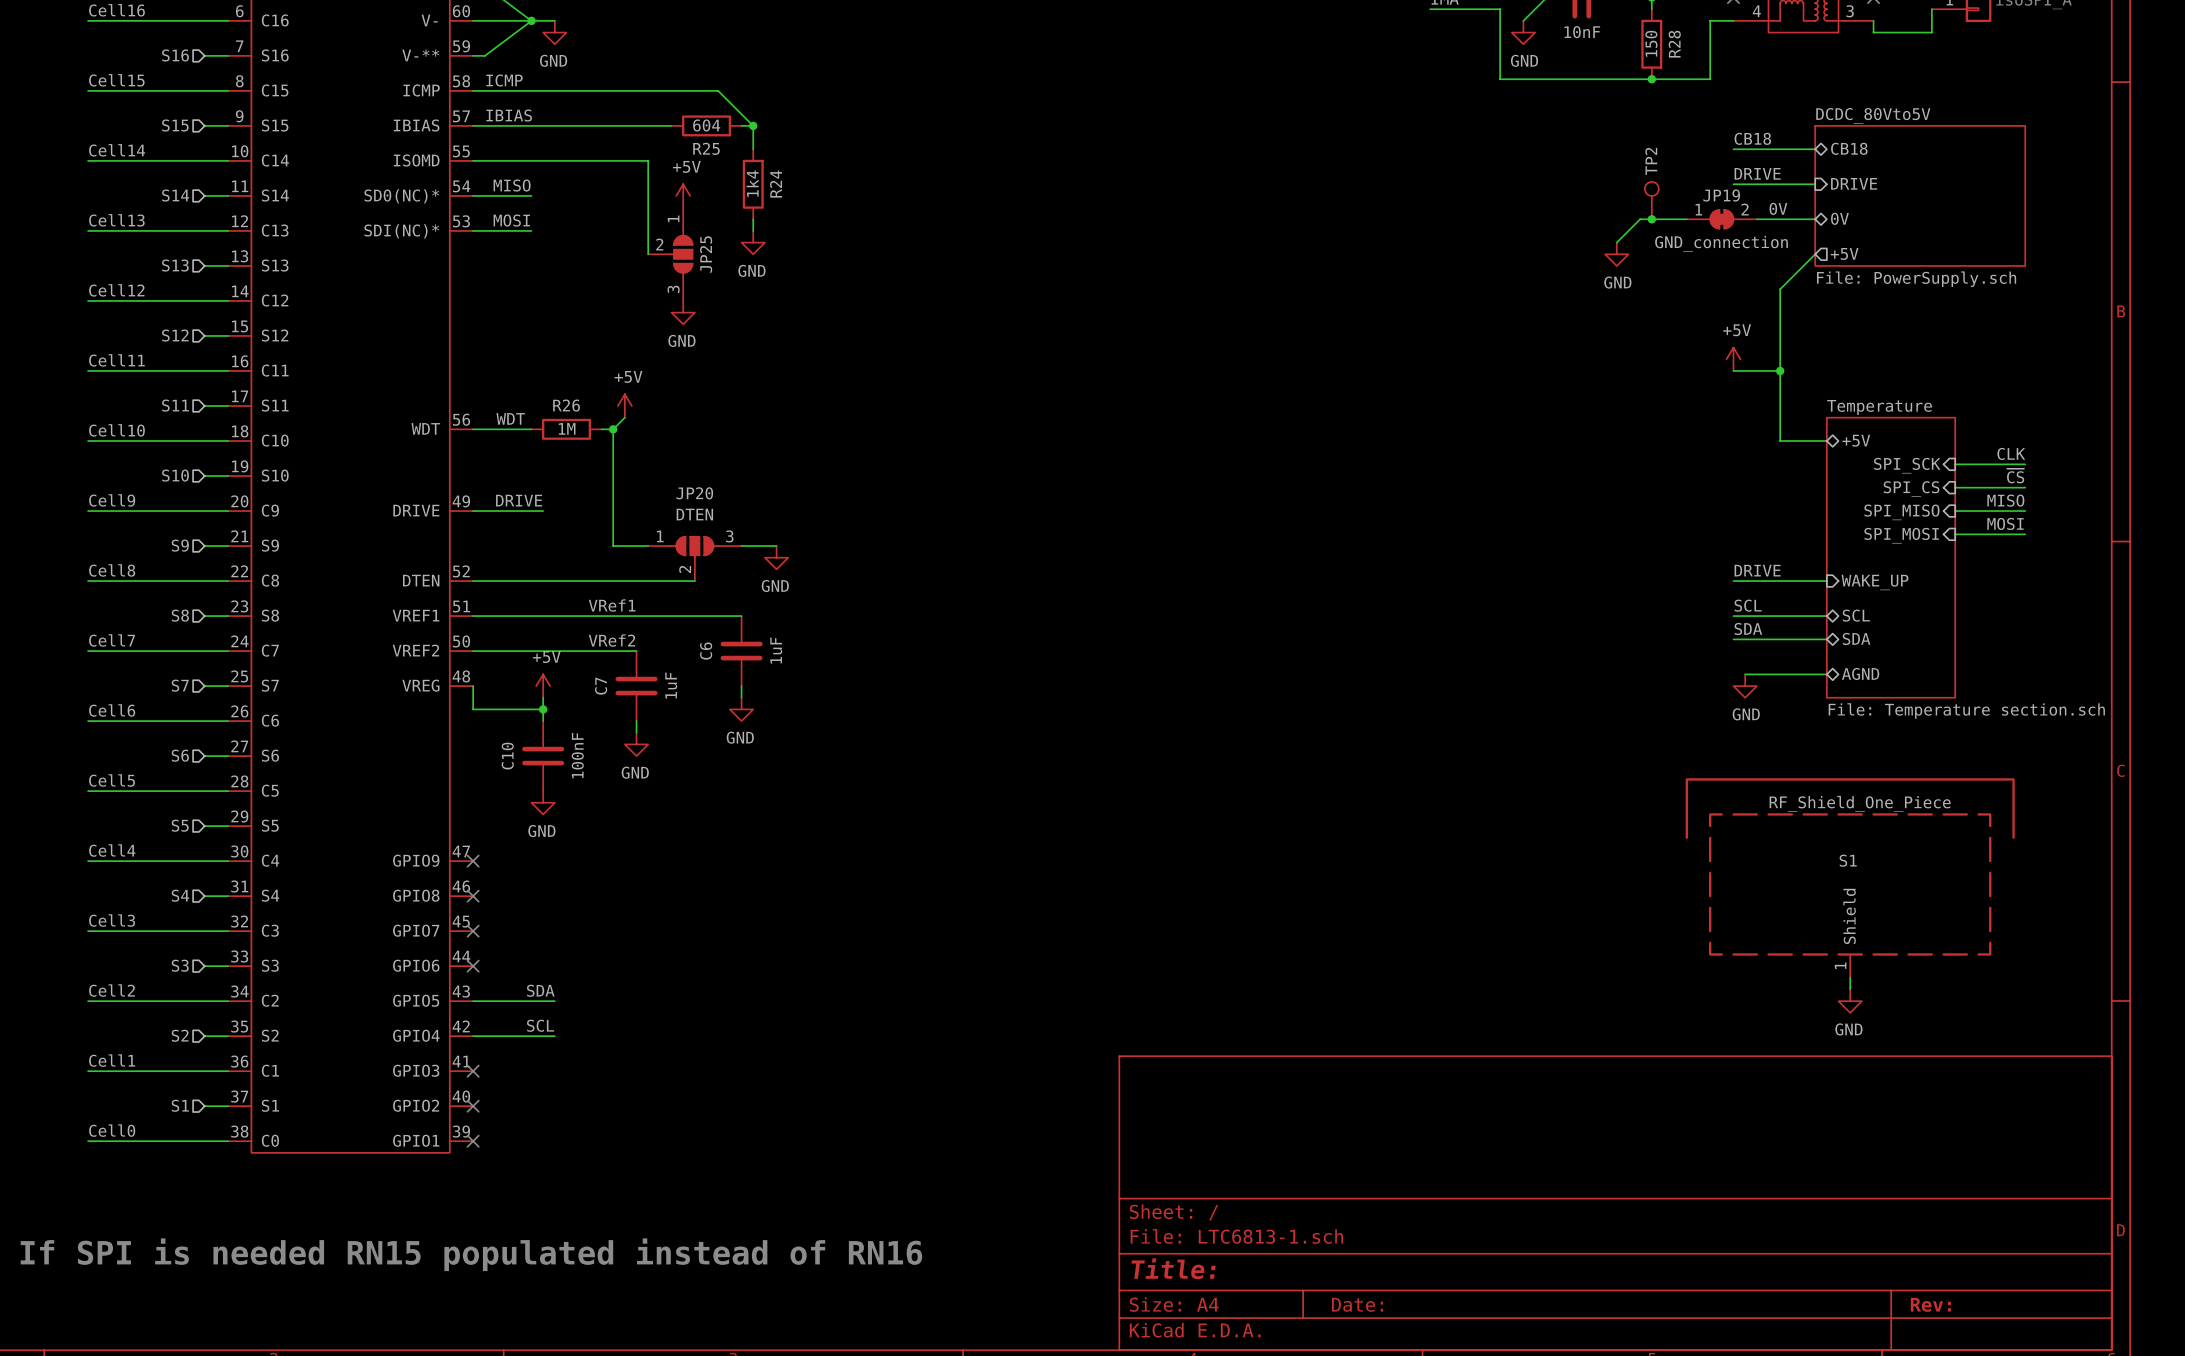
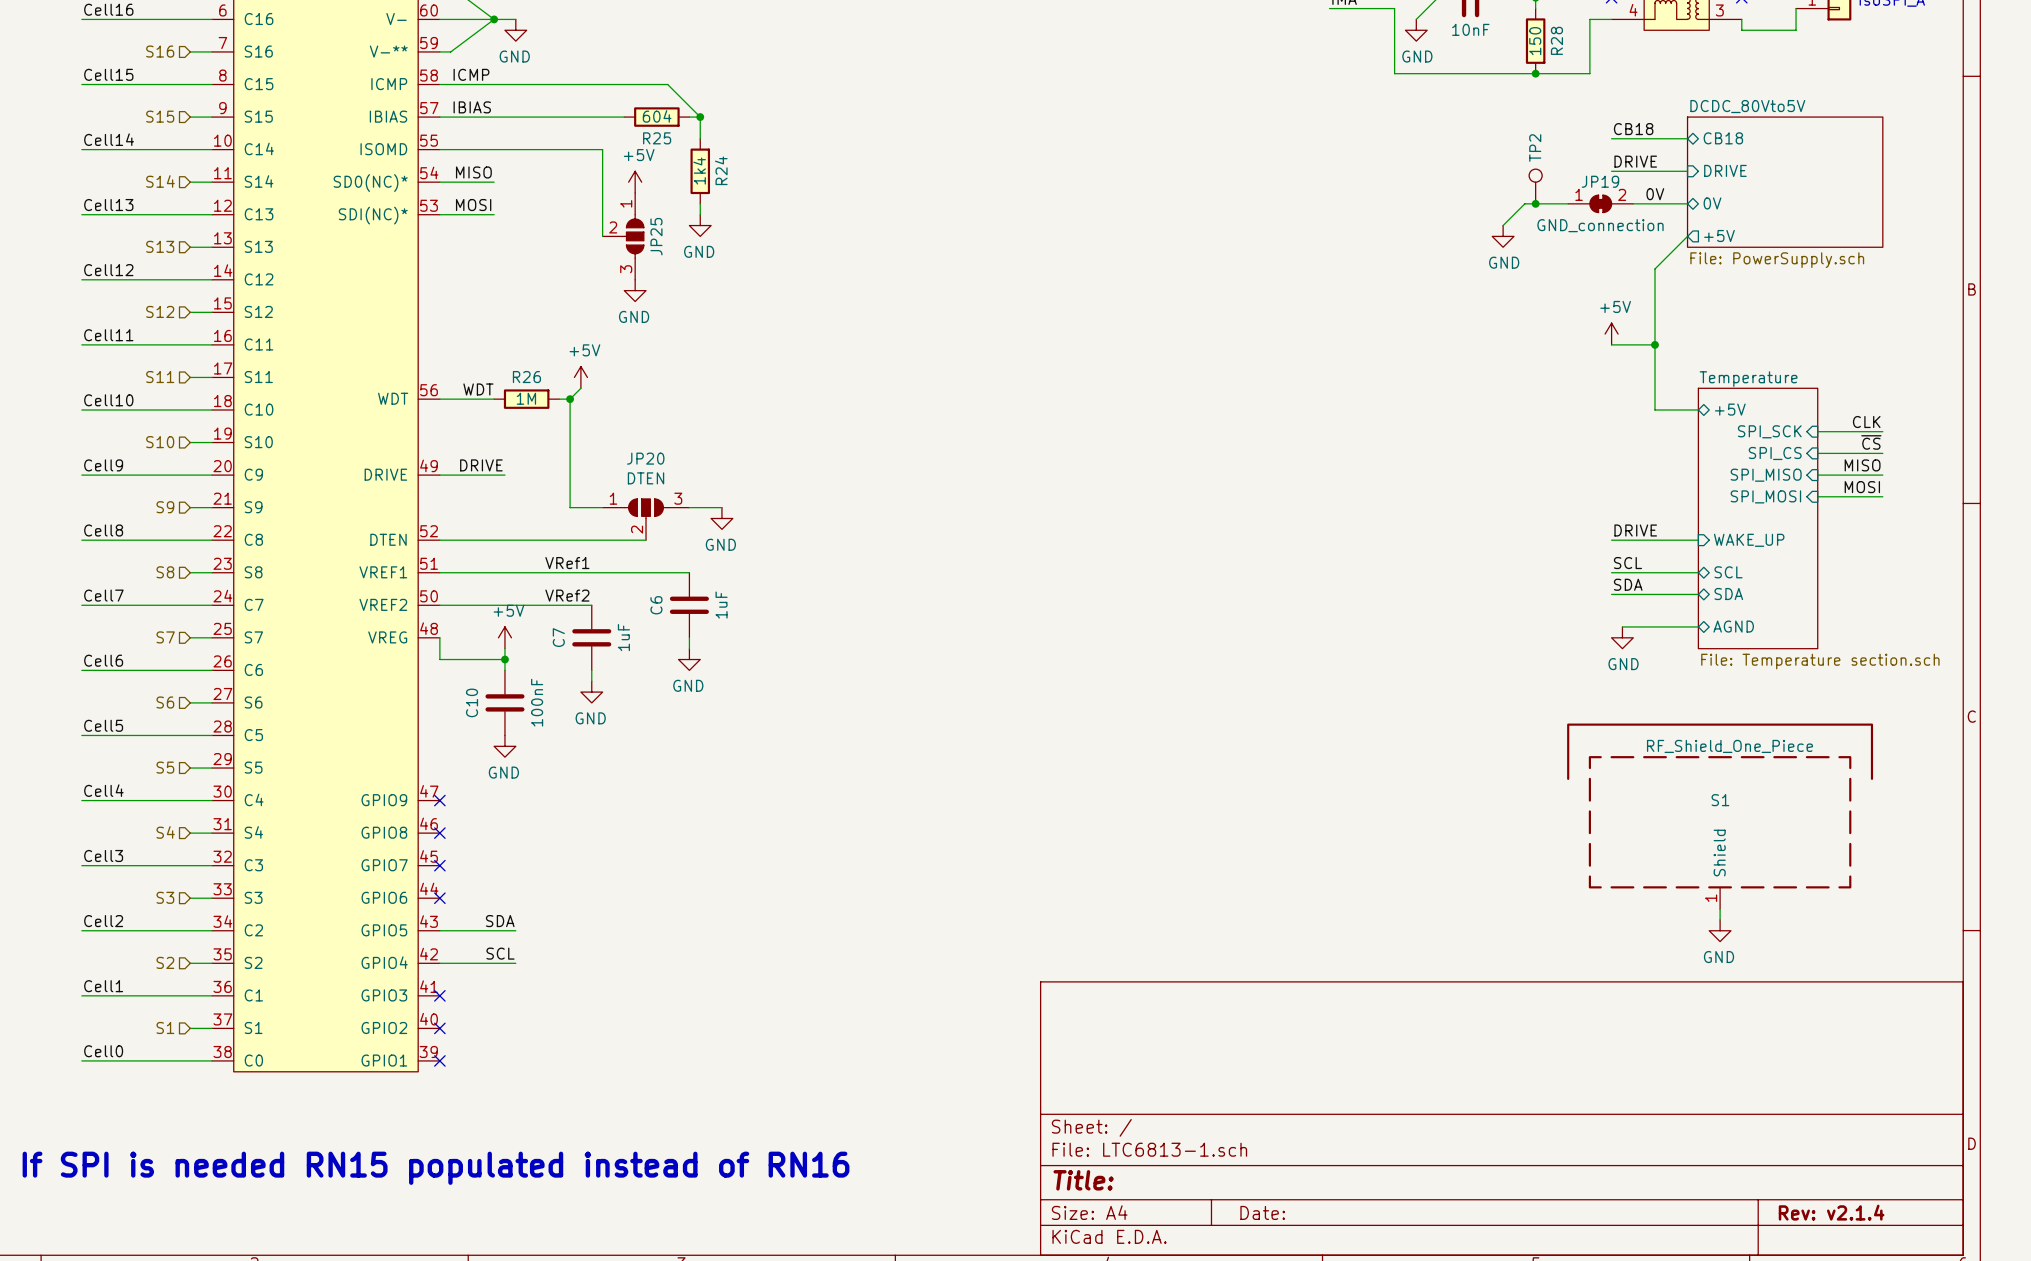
title block: Rev: (1930, 1304) -> Rev: v2.1.4 (1831, 1212)

